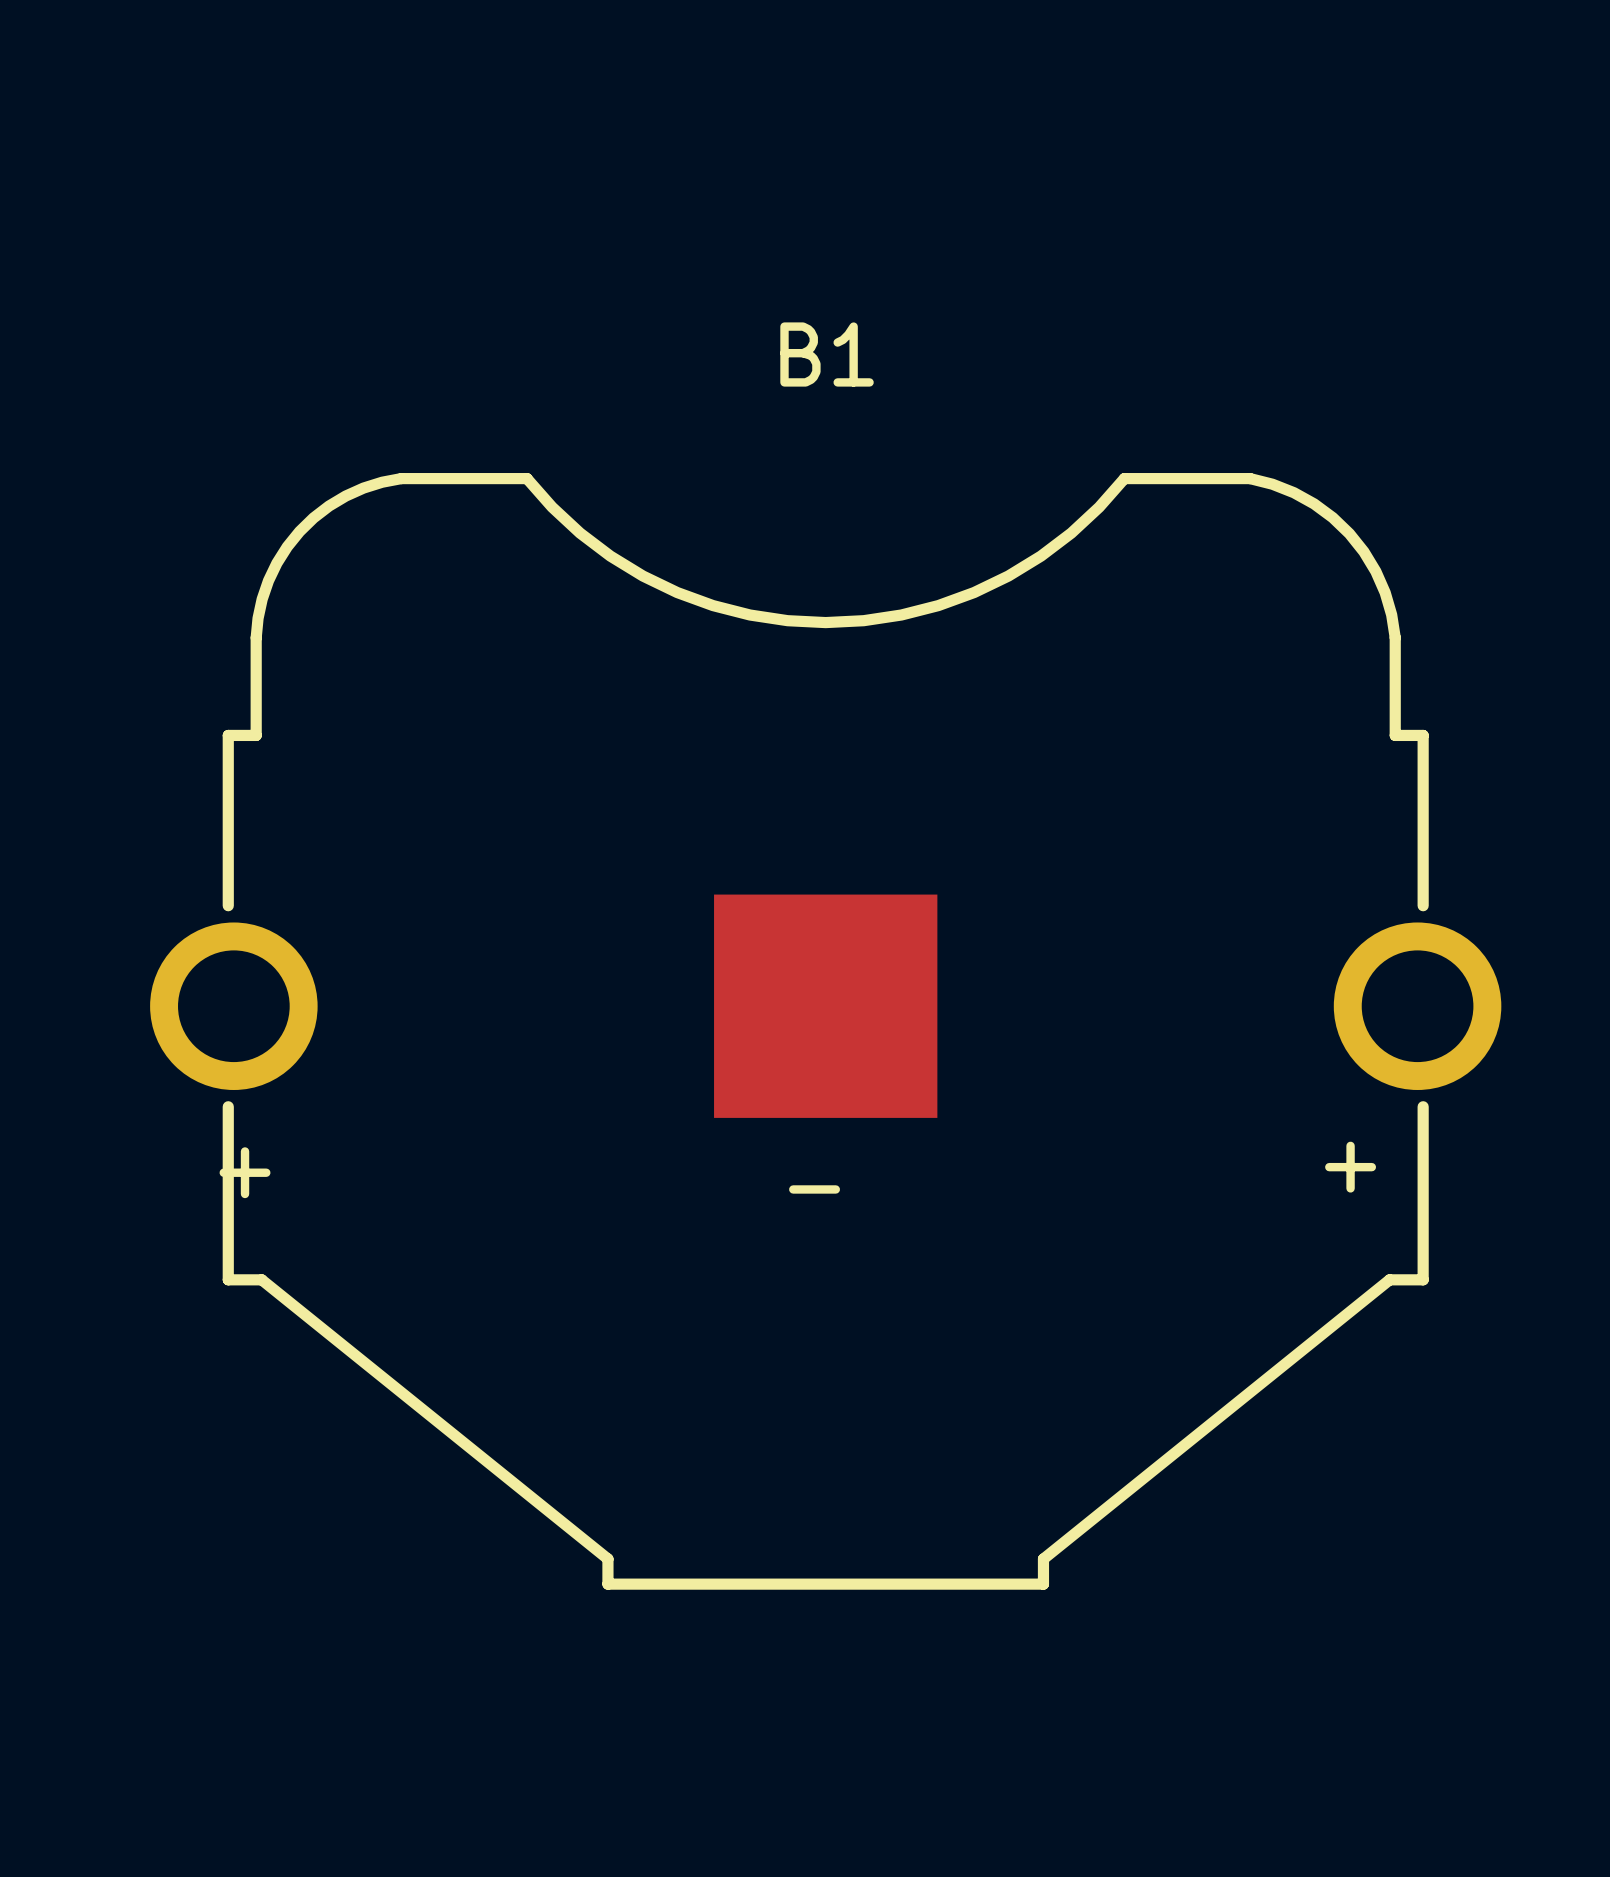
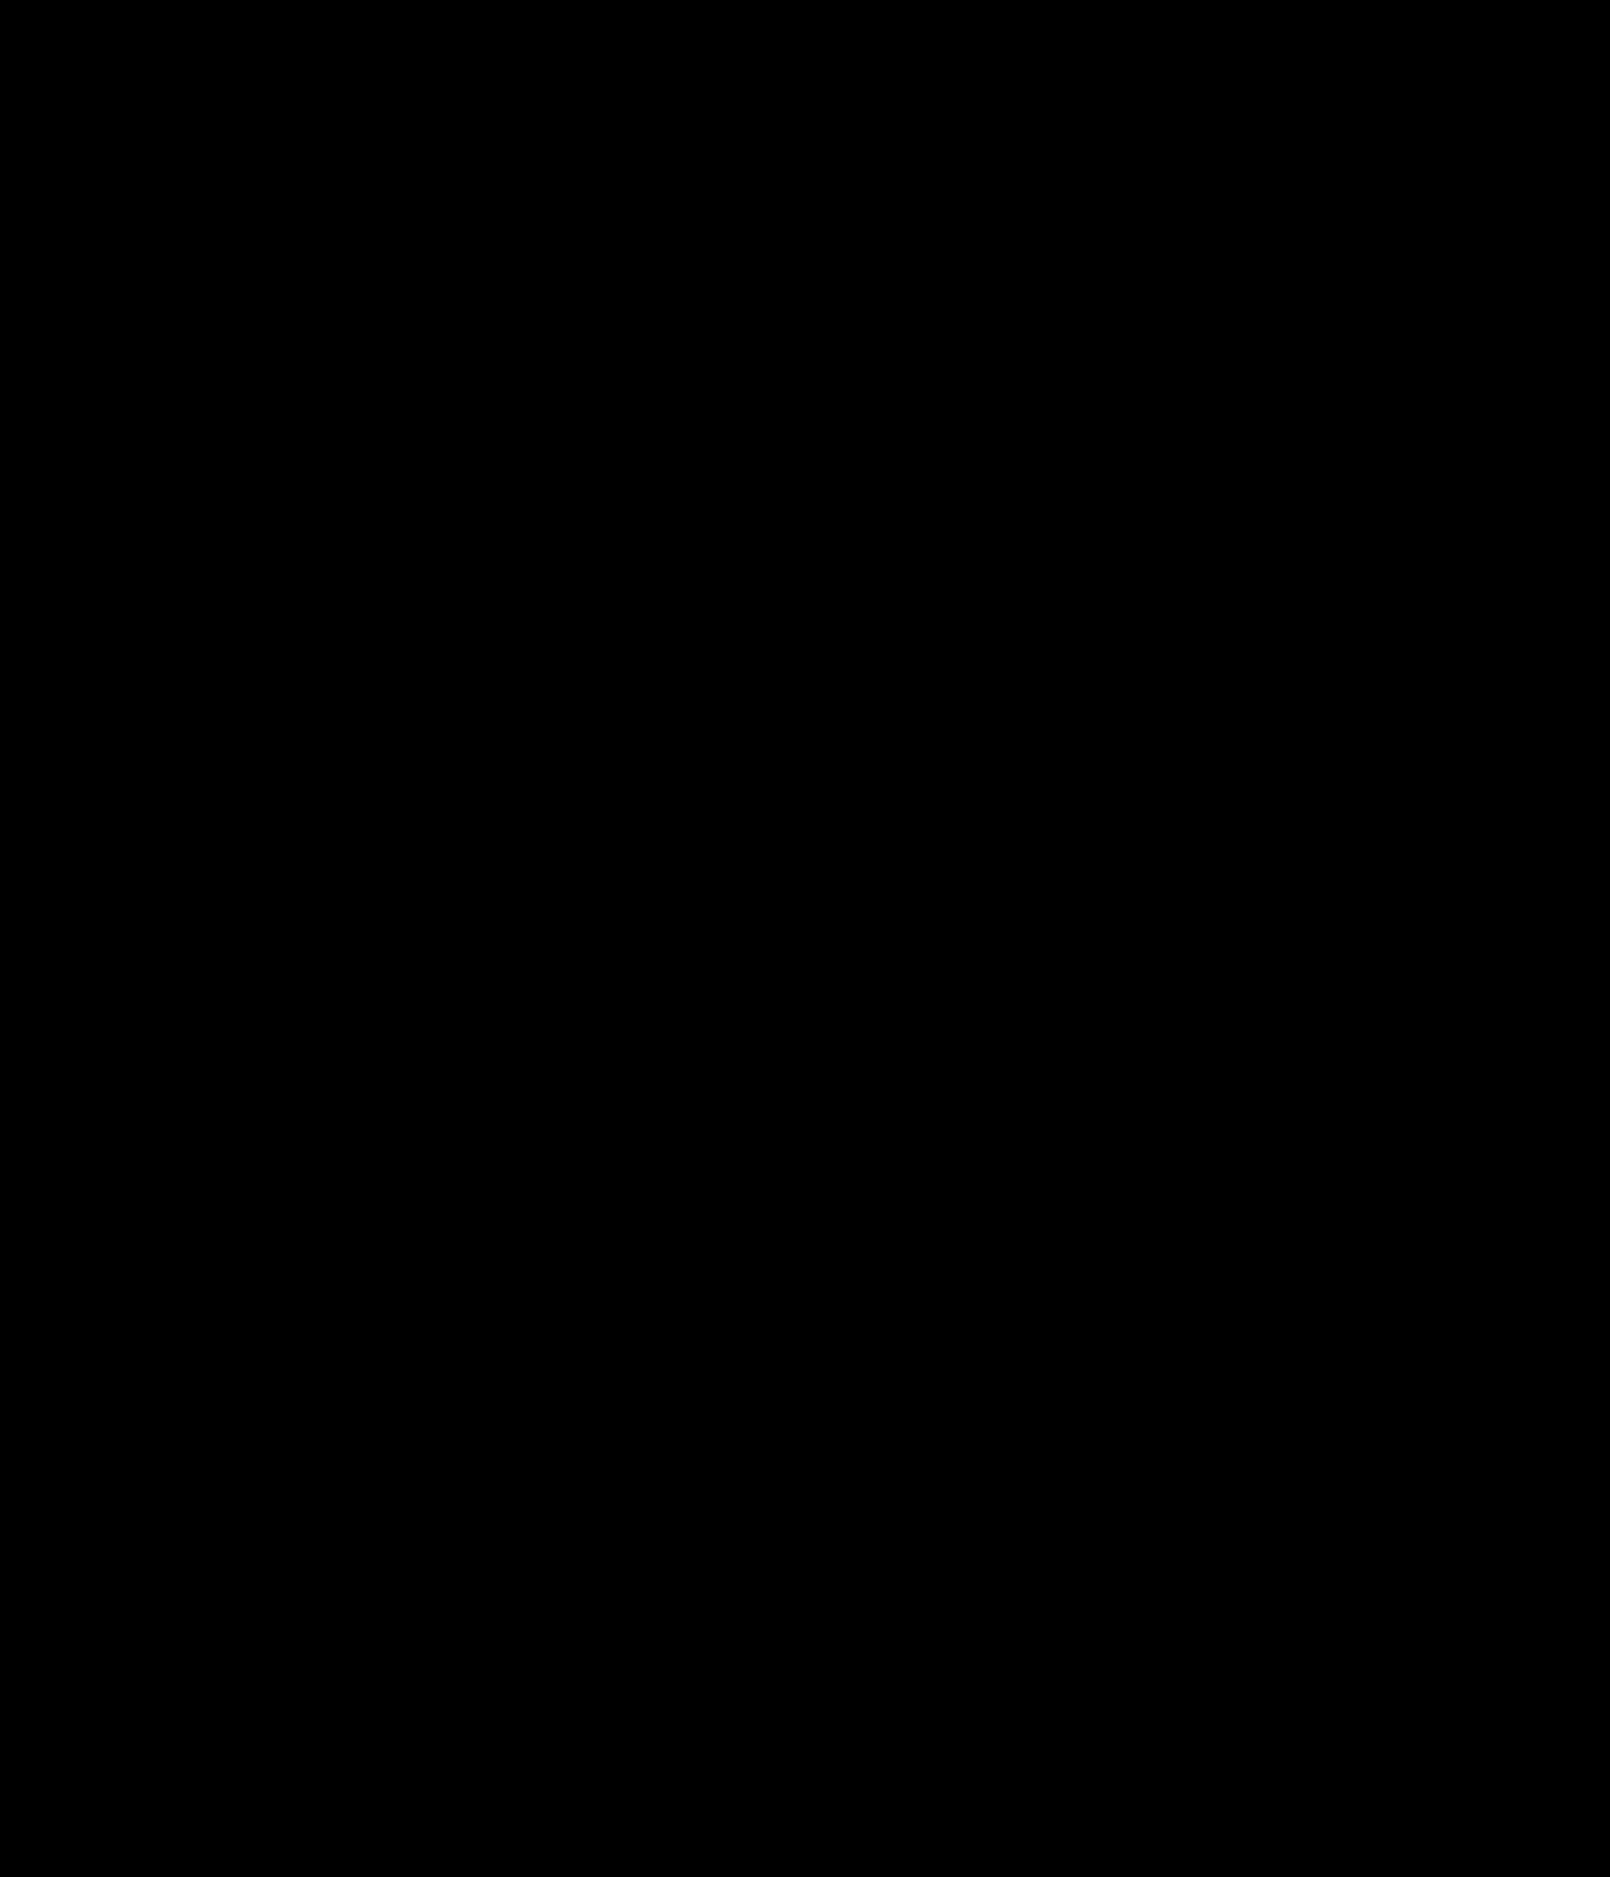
B1: (825, 1031) -> none

